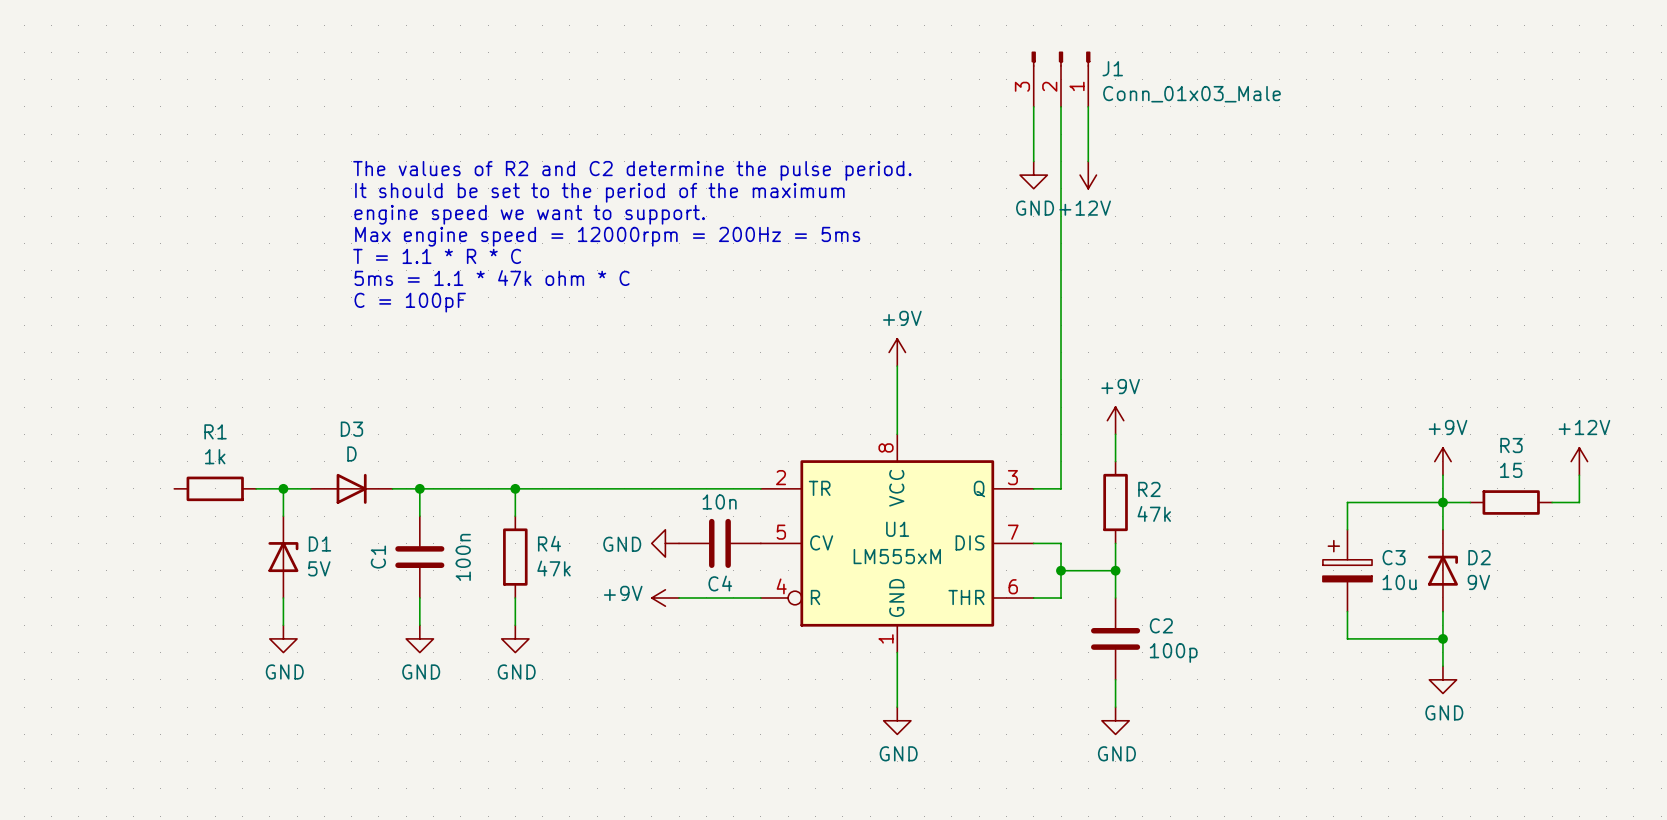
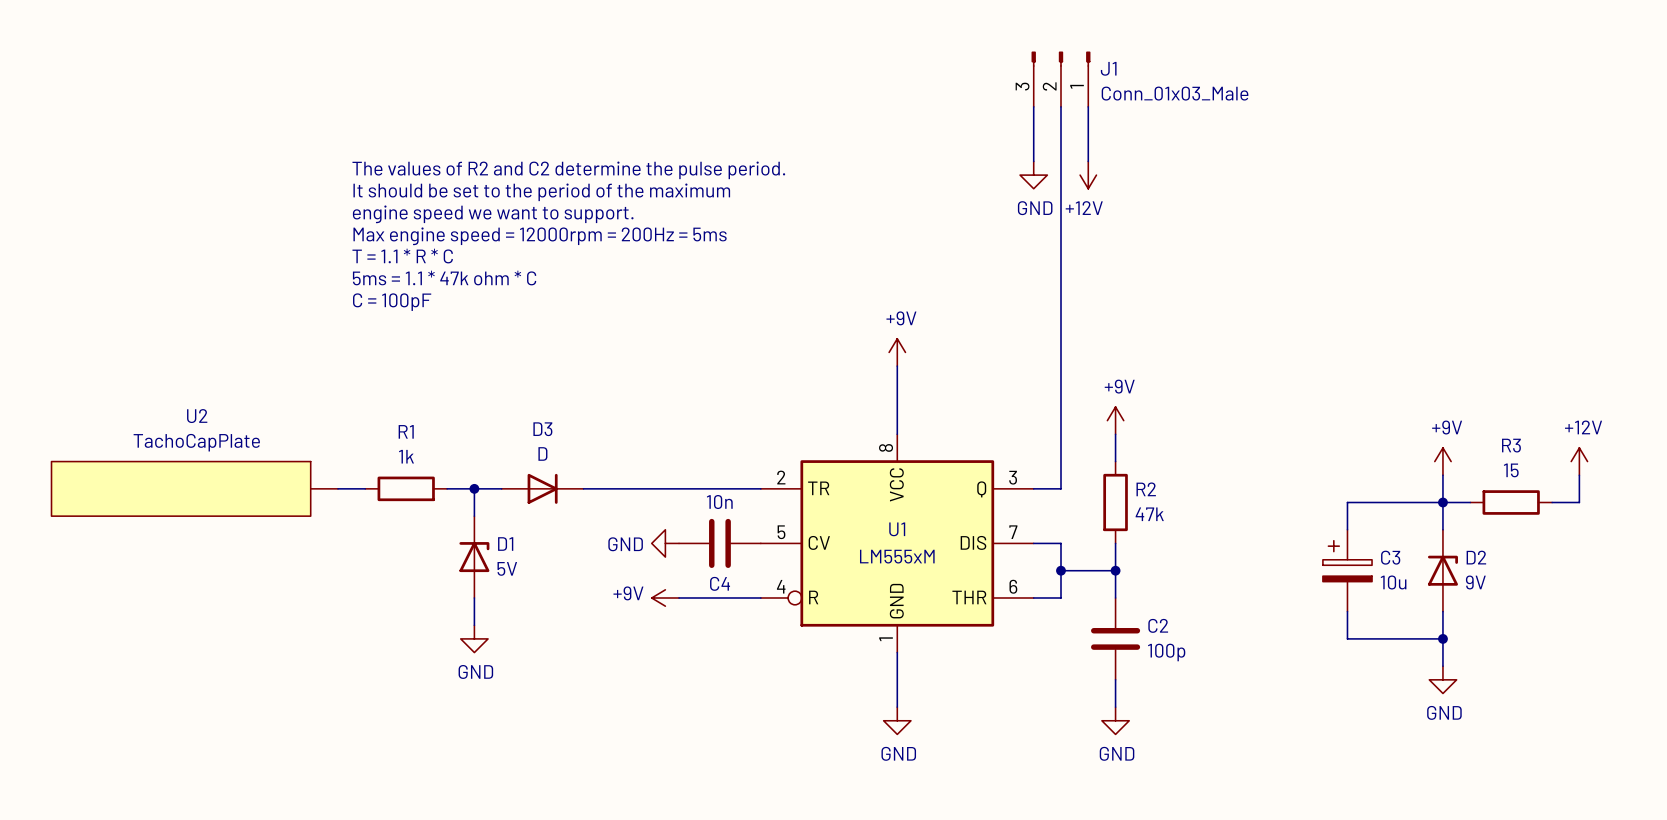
U2: none -> TachoCapPlate (194, 488)
R1 position: (215, 488) -> (406, 488)
junction: (283, 488) -> none
D3 position: (351, 488) -> (542, 488)
wire: (392, 488) (447, 488) -> none
wire: (419, 488) (419, 516) -> none
junction: (419, 488) -> none
junction: none -> (474, 488)
wire: (515, 488) (515, 516) -> (474, 488) (474, 516)
junction: (515, 488) -> none
D1 position: (283, 557) -> (474, 557)
C1: 100n (419, 557) -> none
R4: 47k (515, 557) -> none
wire: (283, 597) (283, 625) -> none
wire: (419, 597) (419, 625) -> none
wire: (515, 597) (515, 625) -> (474, 597) (474, 625)
power symbol: GND (283, 638) -> none
power symbol: GND (419, 638) -> none
power symbol: none -> GND (474, 638)
power symbol: GND (515, 638) -> none

